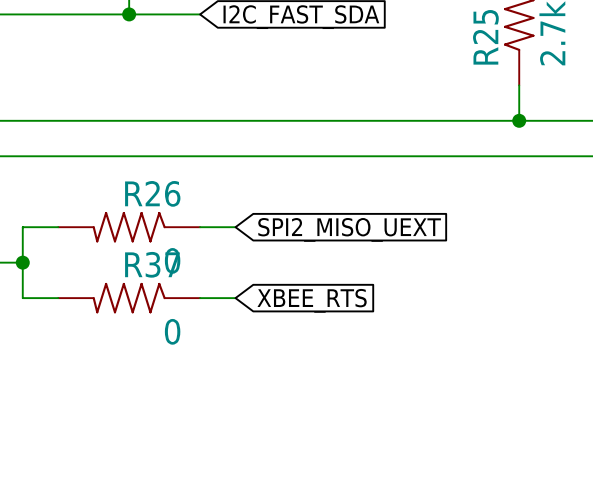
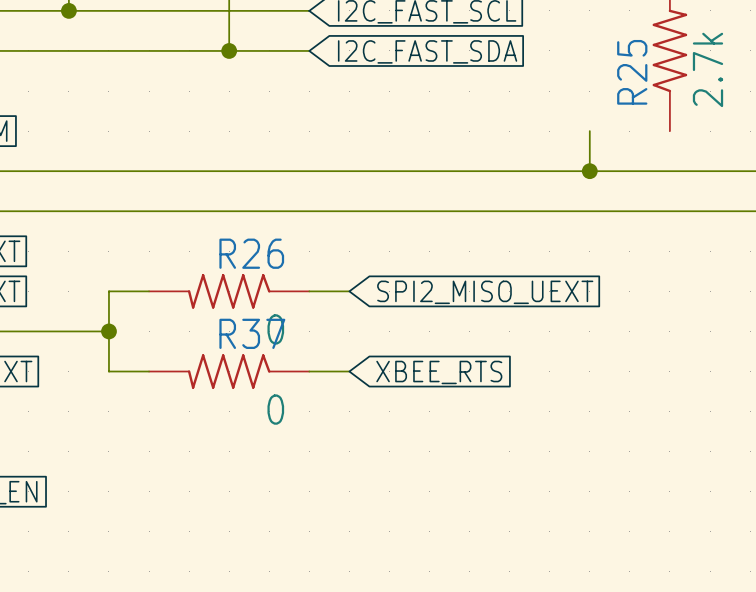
wire: (519, 85) (519, 120) -> (589, 131) (589, 171)
junction position: (519, 120) -> (589, 171)

